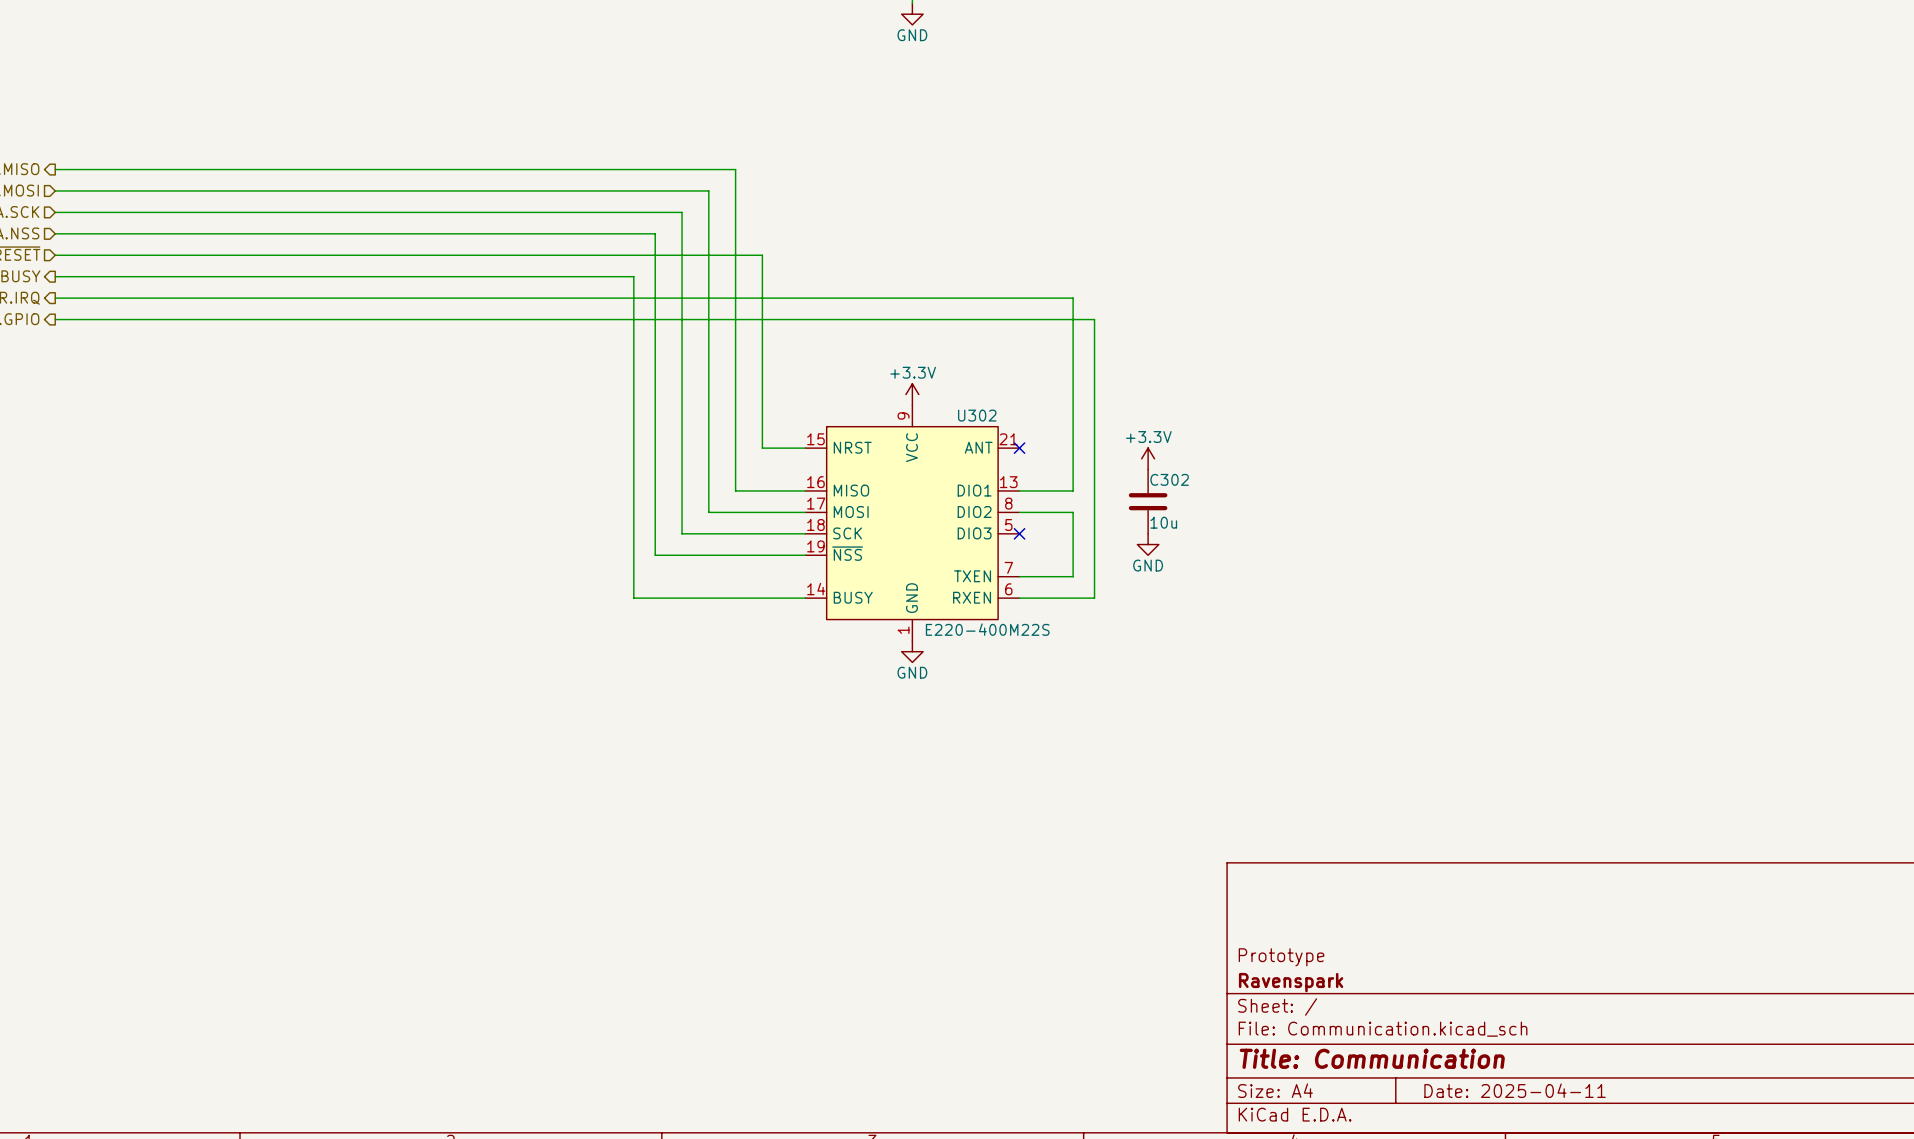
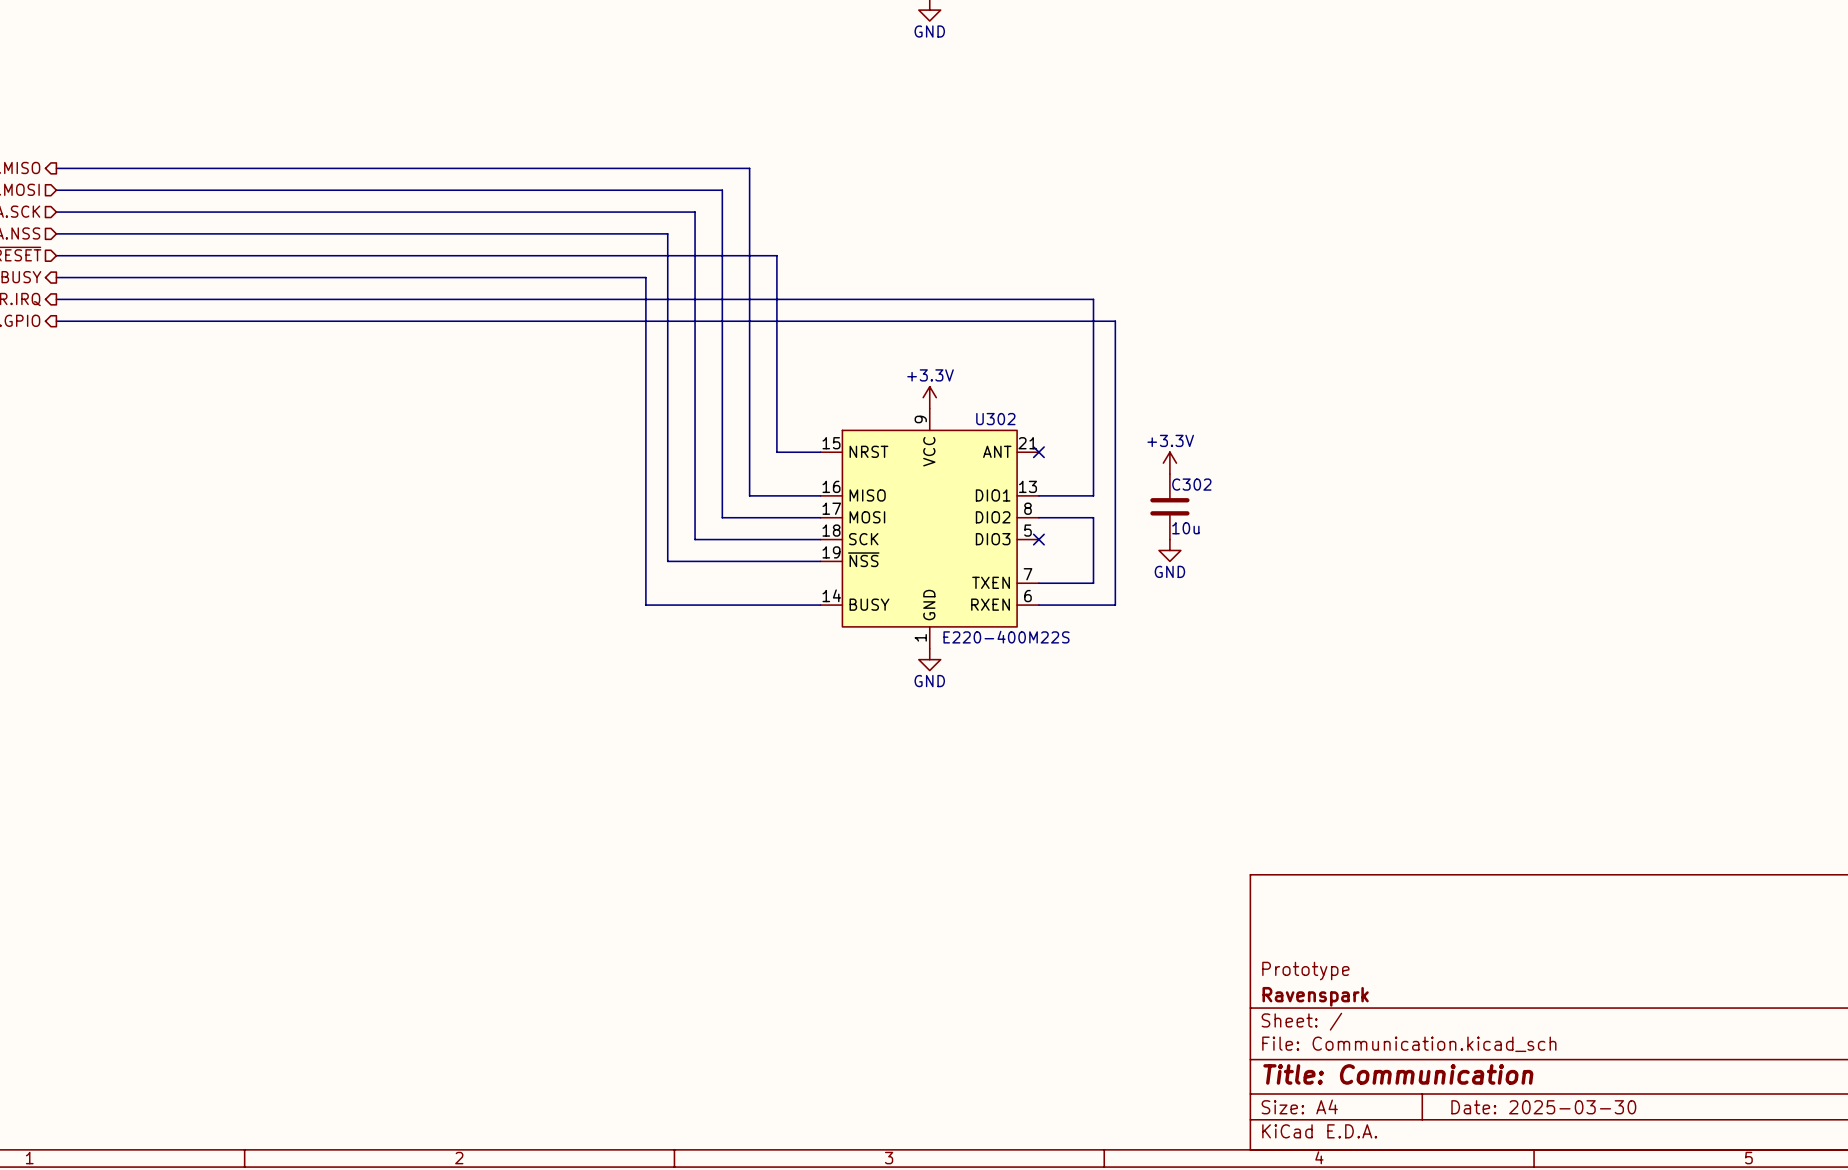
title block: Date: 2025-04-11 (1515, 1090) -> Date: 2025-03-30 (1543, 1107)

